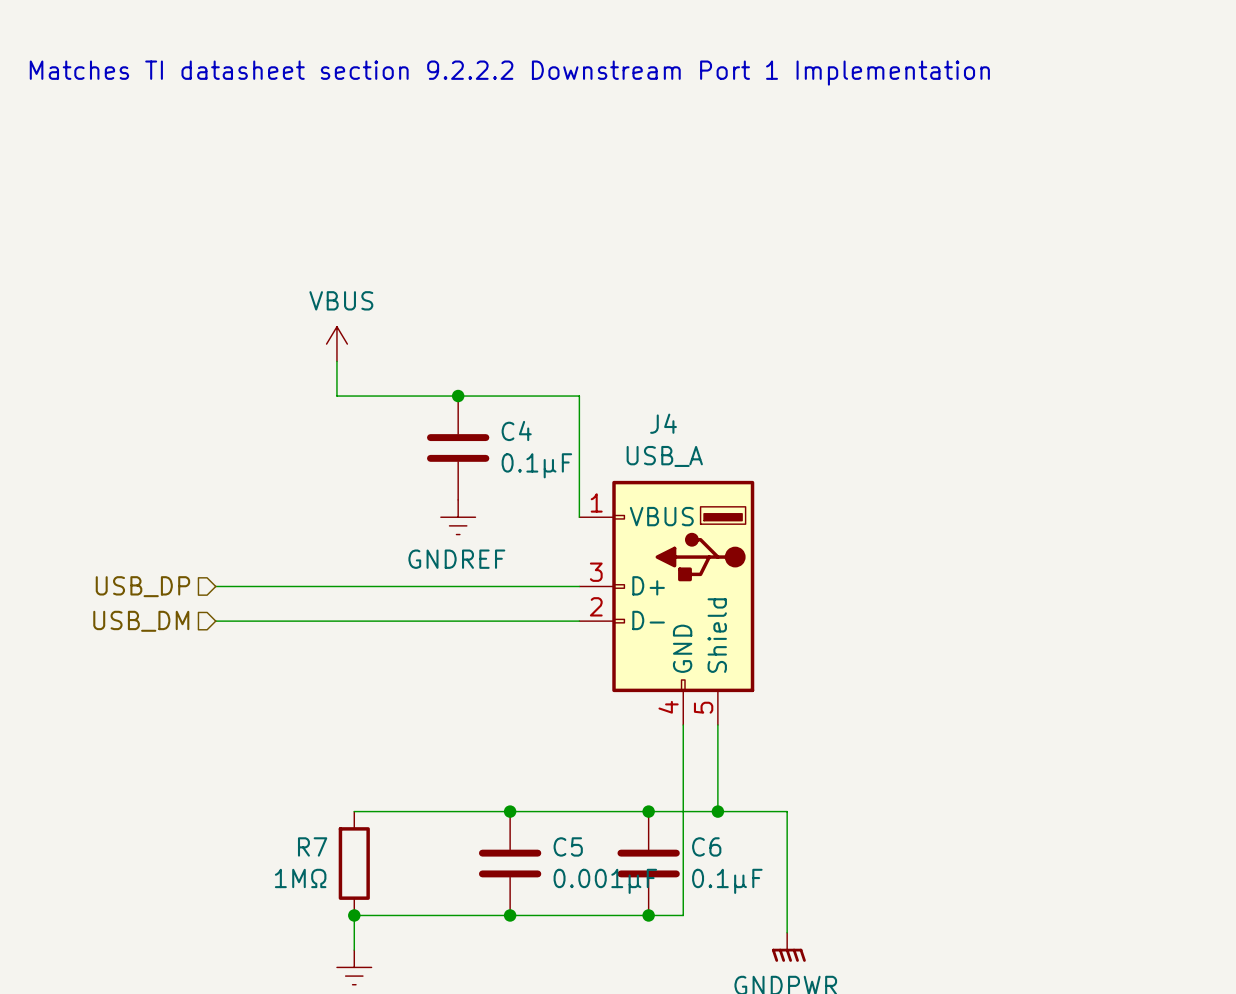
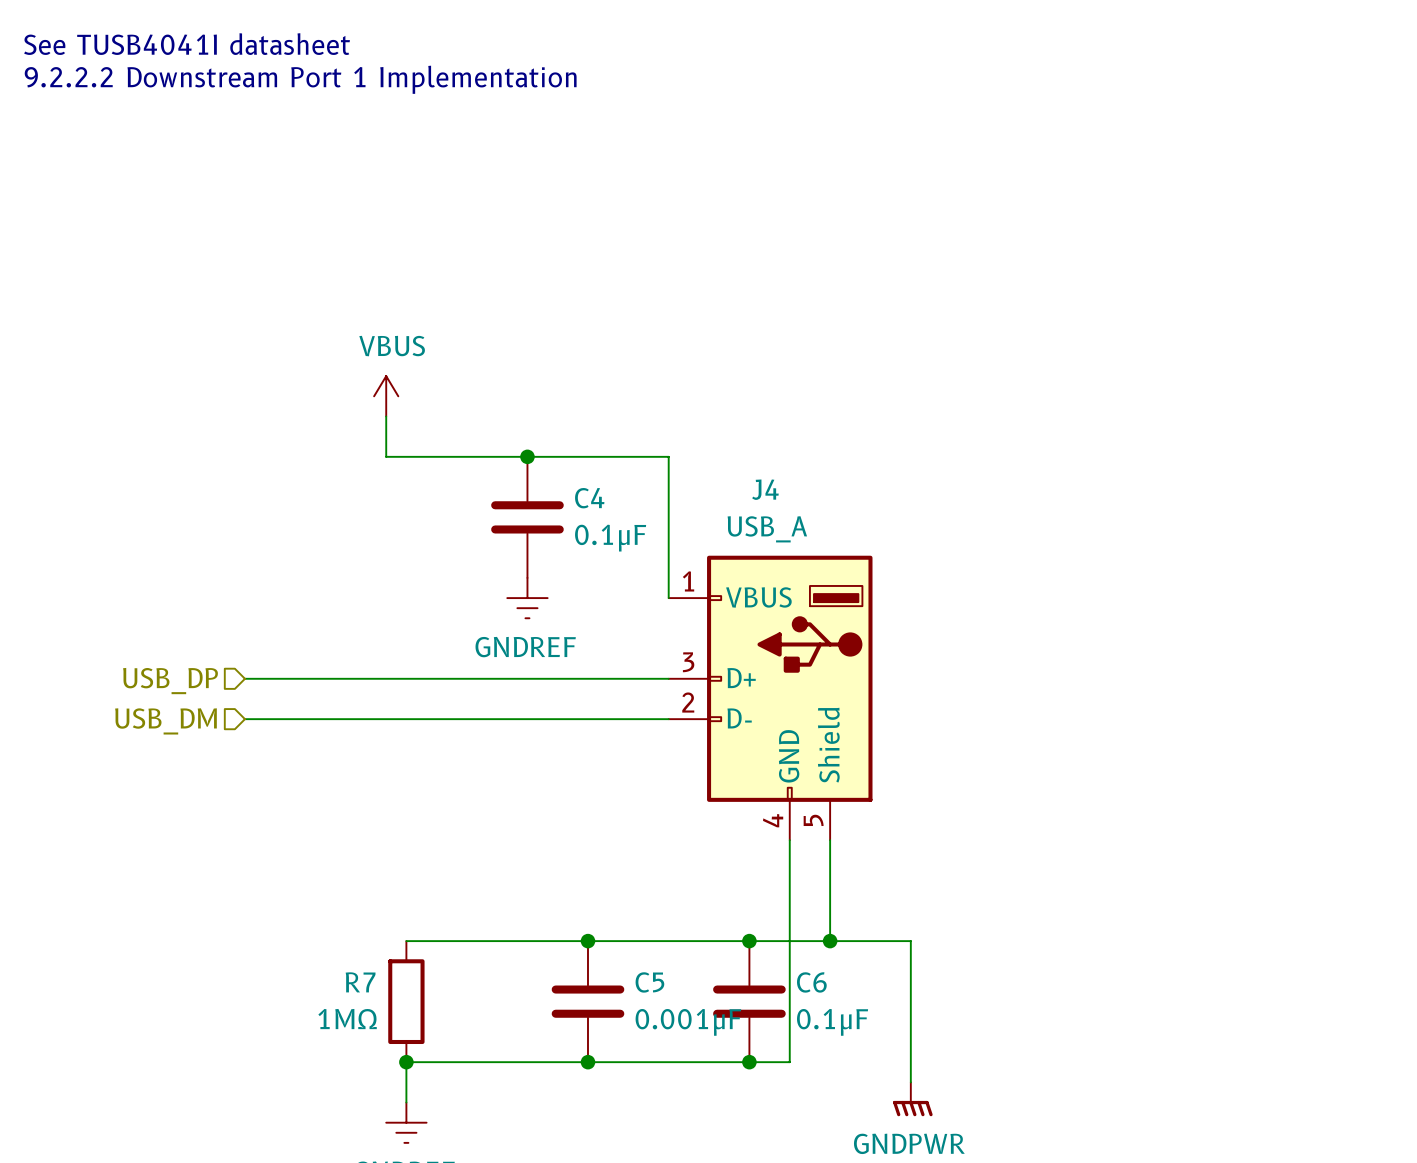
text: none -> See TUSB4041I datasheet (187, 44)
text: Matches TI datasheet section 9.2.2.2 Downstream Port 1 Implementation (509, 73) -> 9.2.2.2 Downstream Port 1 Implementation (300, 79)

